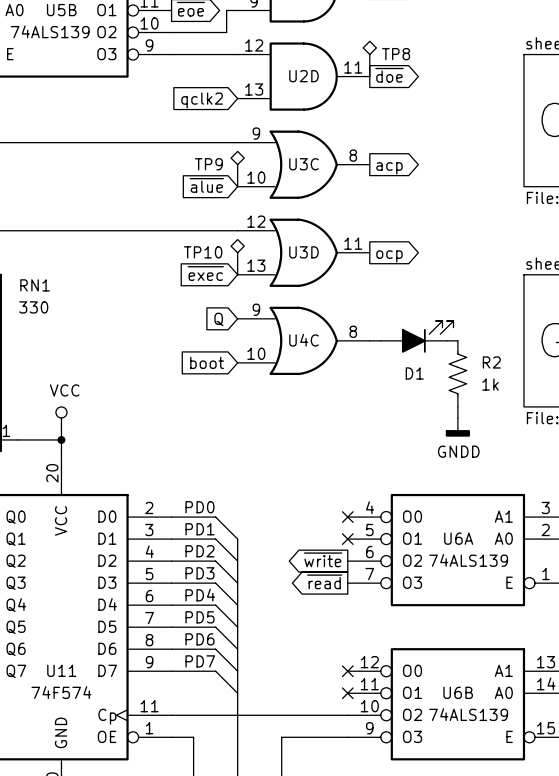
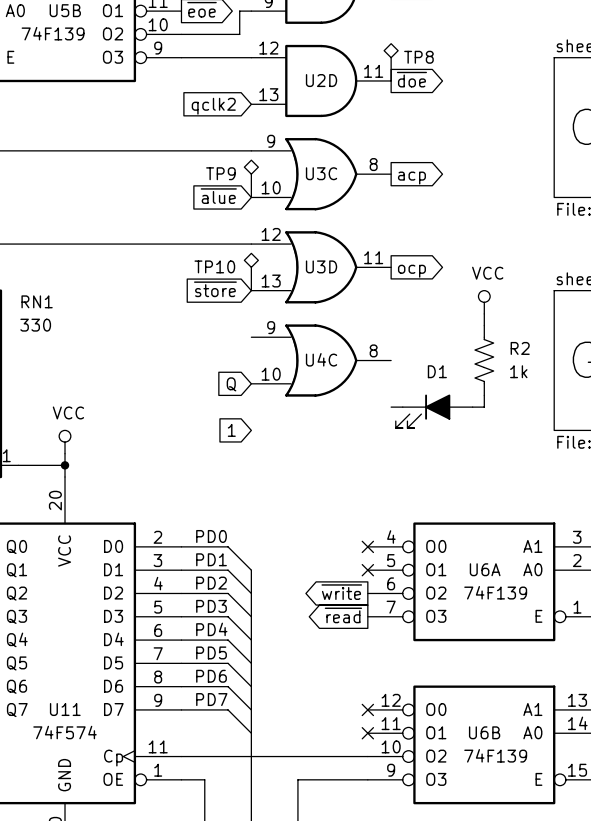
U5B value: 74ALS139 (50, 31) -> 74F139 (53, 33)
global label: ~{exec} (205, 273) -> ~{store} (215, 289)
power symbol: none -> VCC (484, 302)
global label: Q (218, 319) -> none
D1 position: (417, 336) -> (434, 411)
D1 rotation: 0° (427, 336) -> 180° (423, 411)
wire: (369, 340) (380, 340) -> (391, 407) (402, 407)
wire: (446, 340) (457, 340) -> none
global label: boot (207, 362) -> Q (231, 384)
wire: none -> (484, 395) (484, 407) (472, 407)
R2 position: (457, 373) -> (484, 360)
global label: none -> 1 (231, 430)
wire: (457, 406) (457, 417) -> (484, 313) (484, 325)
power symbol: GNDD (457, 427) -> none
U6A value: 74ALS139 (468, 560) -> 74F139 (495, 592)
U6B value: 74ALS139 (468, 714) -> 74F139 (495, 755)

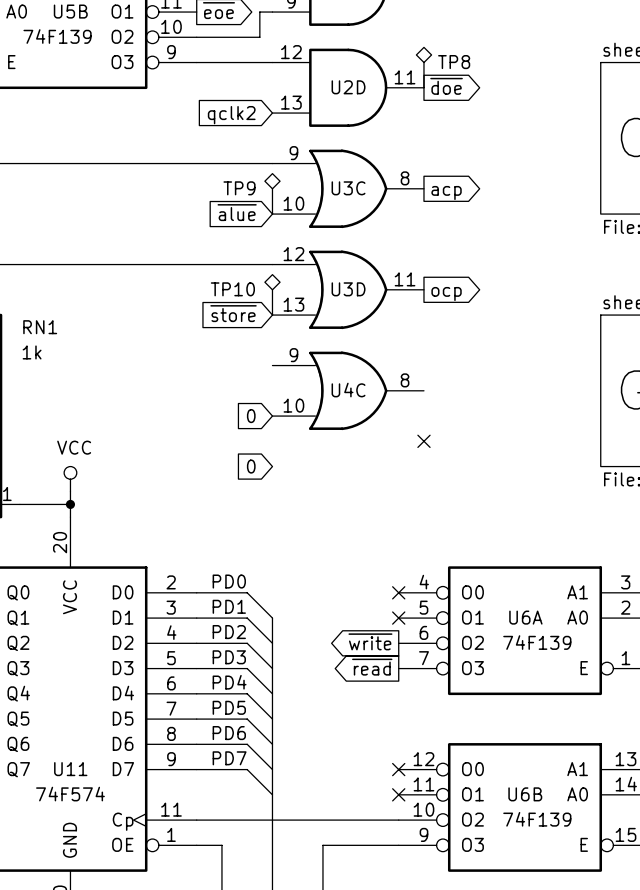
power symbol: VCC (484, 302) -> none
wire: (484, 313) (484, 325) -> none
RN1 value: 330 (35, 325) -> 1k (32, 352)
R2: 1k (484, 360) -> none
global label: Q (231, 384) -> 0 (251, 416)
wire: (484, 395) (484, 407) (472, 407) -> none
wire: (391, 407) (402, 407) -> none
no-connect mark: none -> (423, 441)
D1: (434, 411) -> none
global label: 1 (231, 430) -> 0 (251, 466)

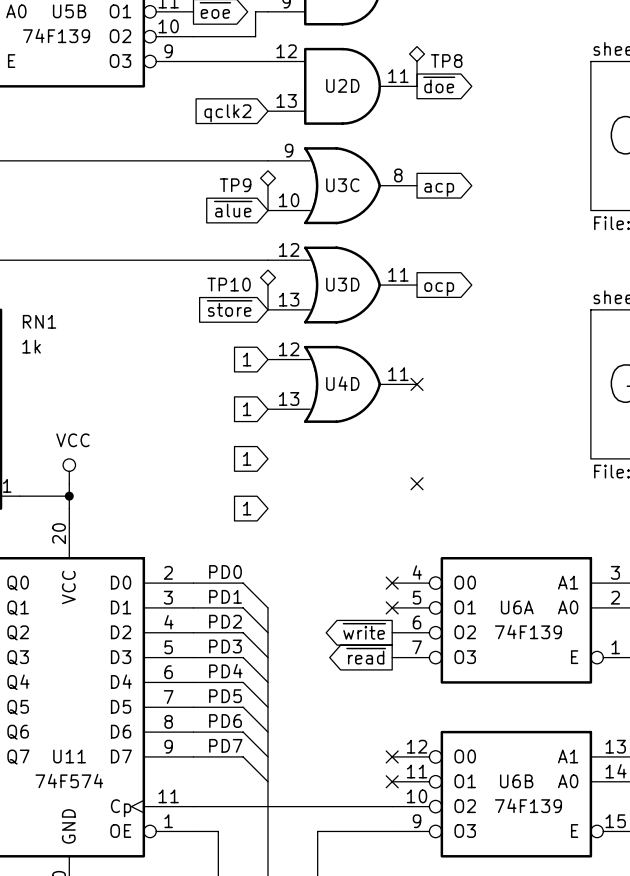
U4C pin number: 9 (293, 355) -> 12 (289, 349)
global label: none -> 1 (247, 359)
U4C pin number: 8 (405, 380) -> 11 (398, 374)
U4C name: U4C (348, 390) -> U4D (342, 383)
no-connect mark: none -> (417, 384)
U4C pin number: 10 (293, 405) -> 13 (289, 398)
global label: 0 (251, 416) -> 1 (247, 409)
no-connect mark: (423, 441) -> none
global label: 0 (251, 466) -> 1 (247, 458)
no-connect mark: none -> (417, 483)
global label: none -> 1 (247, 508)

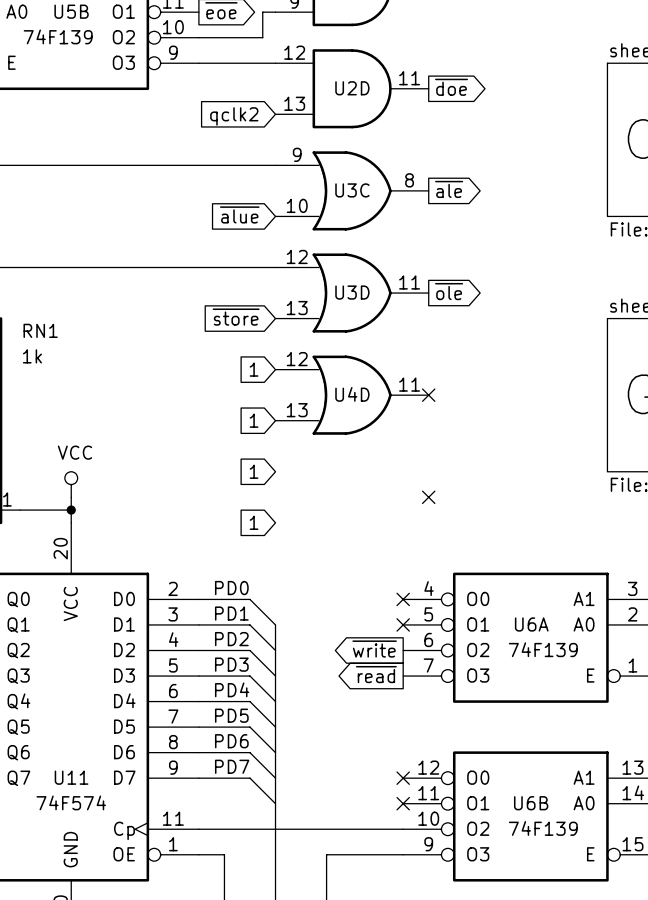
TP8: (417, 66) -> none
global label: acp (439, 189) -> ~{ale} (449, 189)
TP9: (268, 190) -> none
global label: ocp (439, 289) -> ~{ole} (449, 291)
TP10: (268, 290) -> none

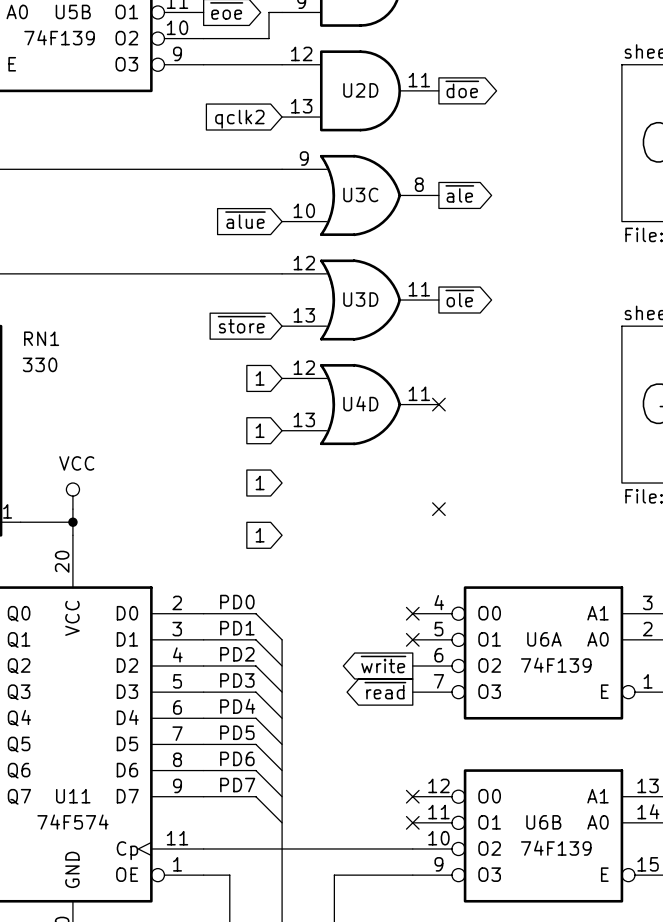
RN1 value: 1k (32, 356) -> 330 (40, 364)

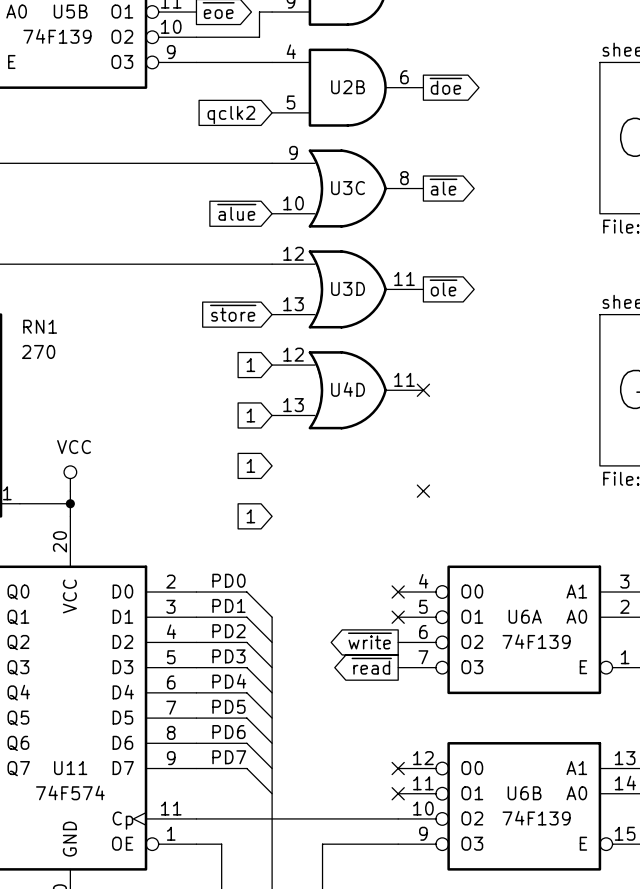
U2D pin number: 12 (301, 53) -> 4 (291, 51)
U2D pin number: 11 (419, 80) -> 6 (404, 77)
U2D name: U2D (360, 90) -> U2B (348, 87)
U2D pin number: 13 (301, 106) -> 5 (291, 102)
RN1 value: 330 (40, 364) -> 270 (38, 351)

